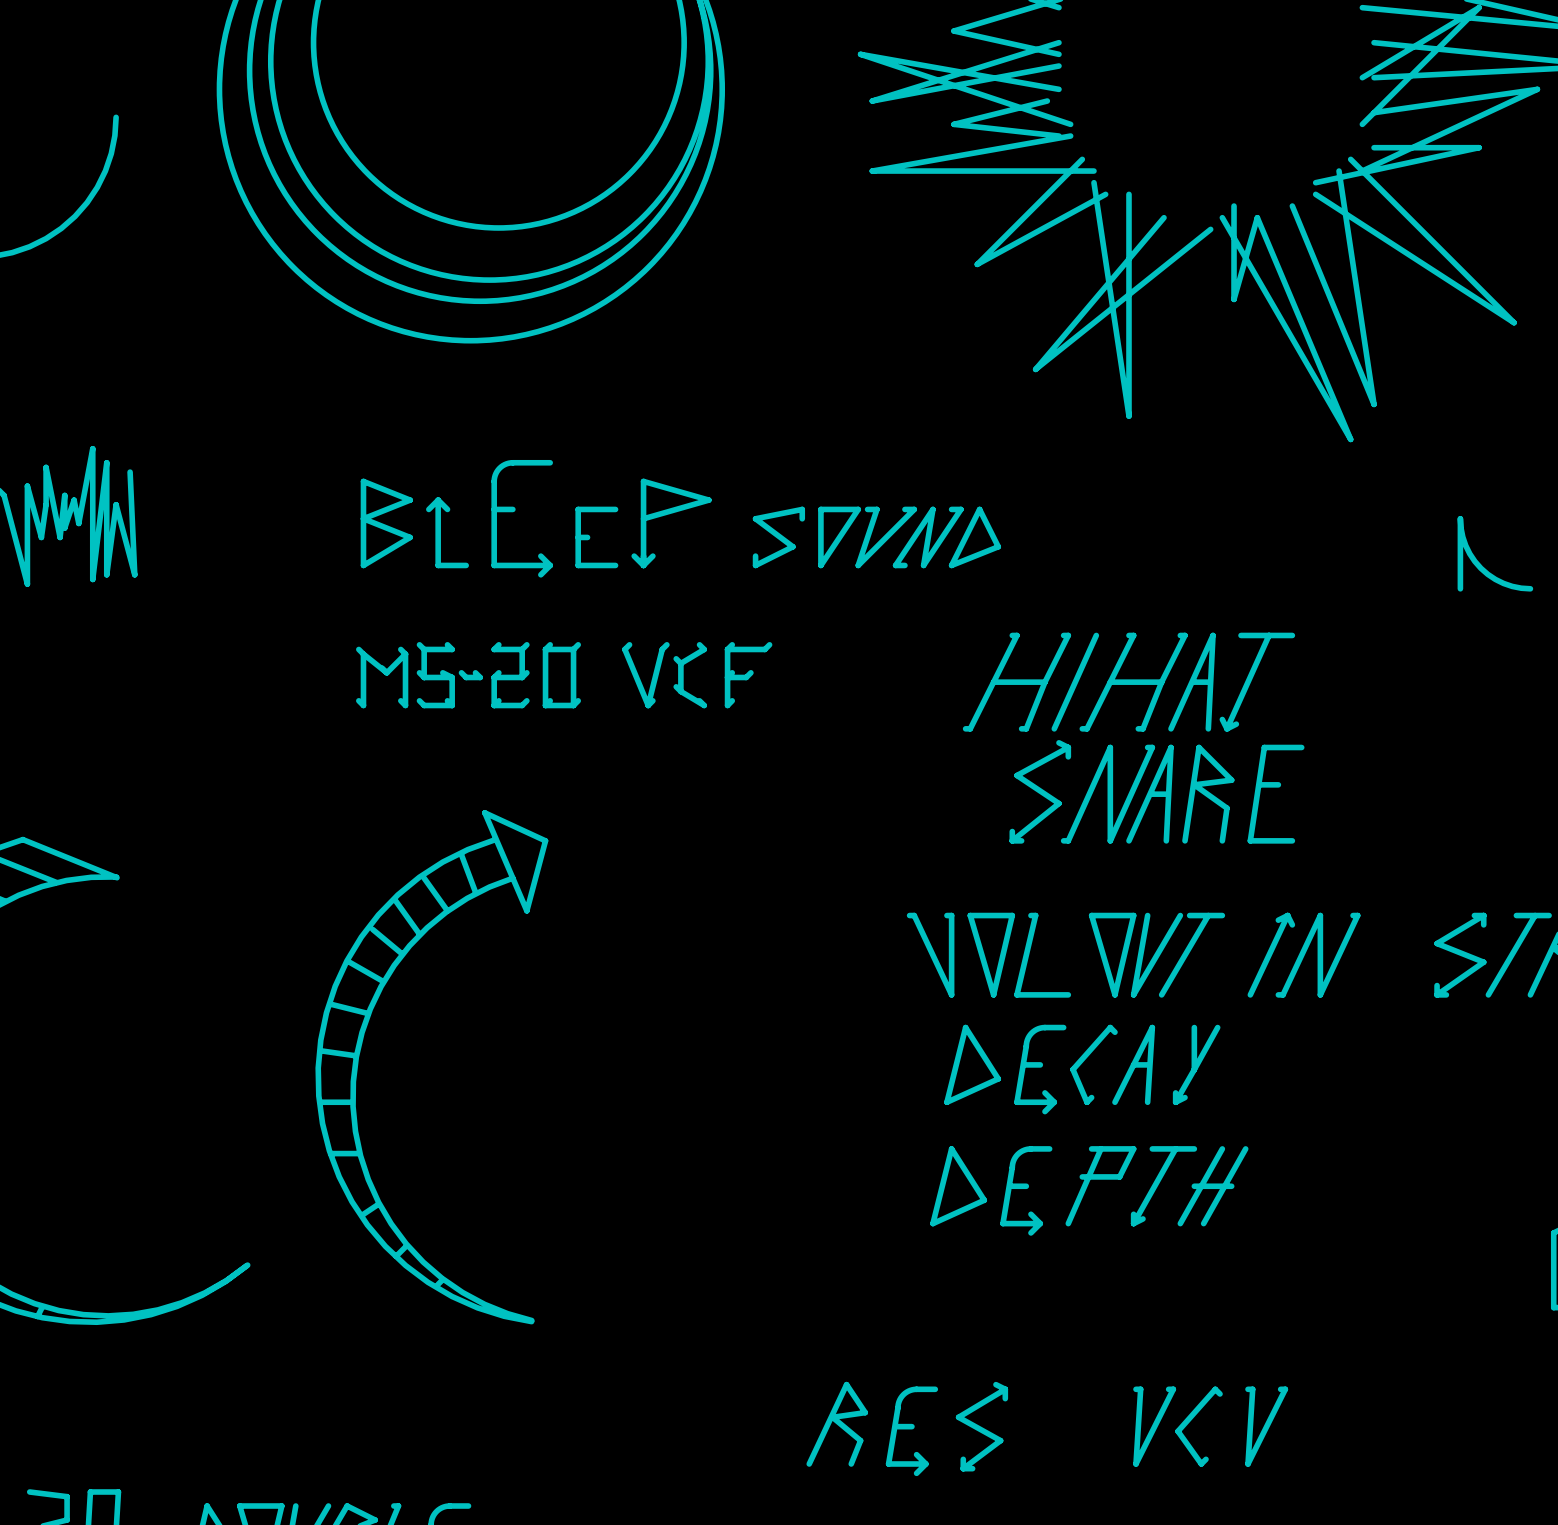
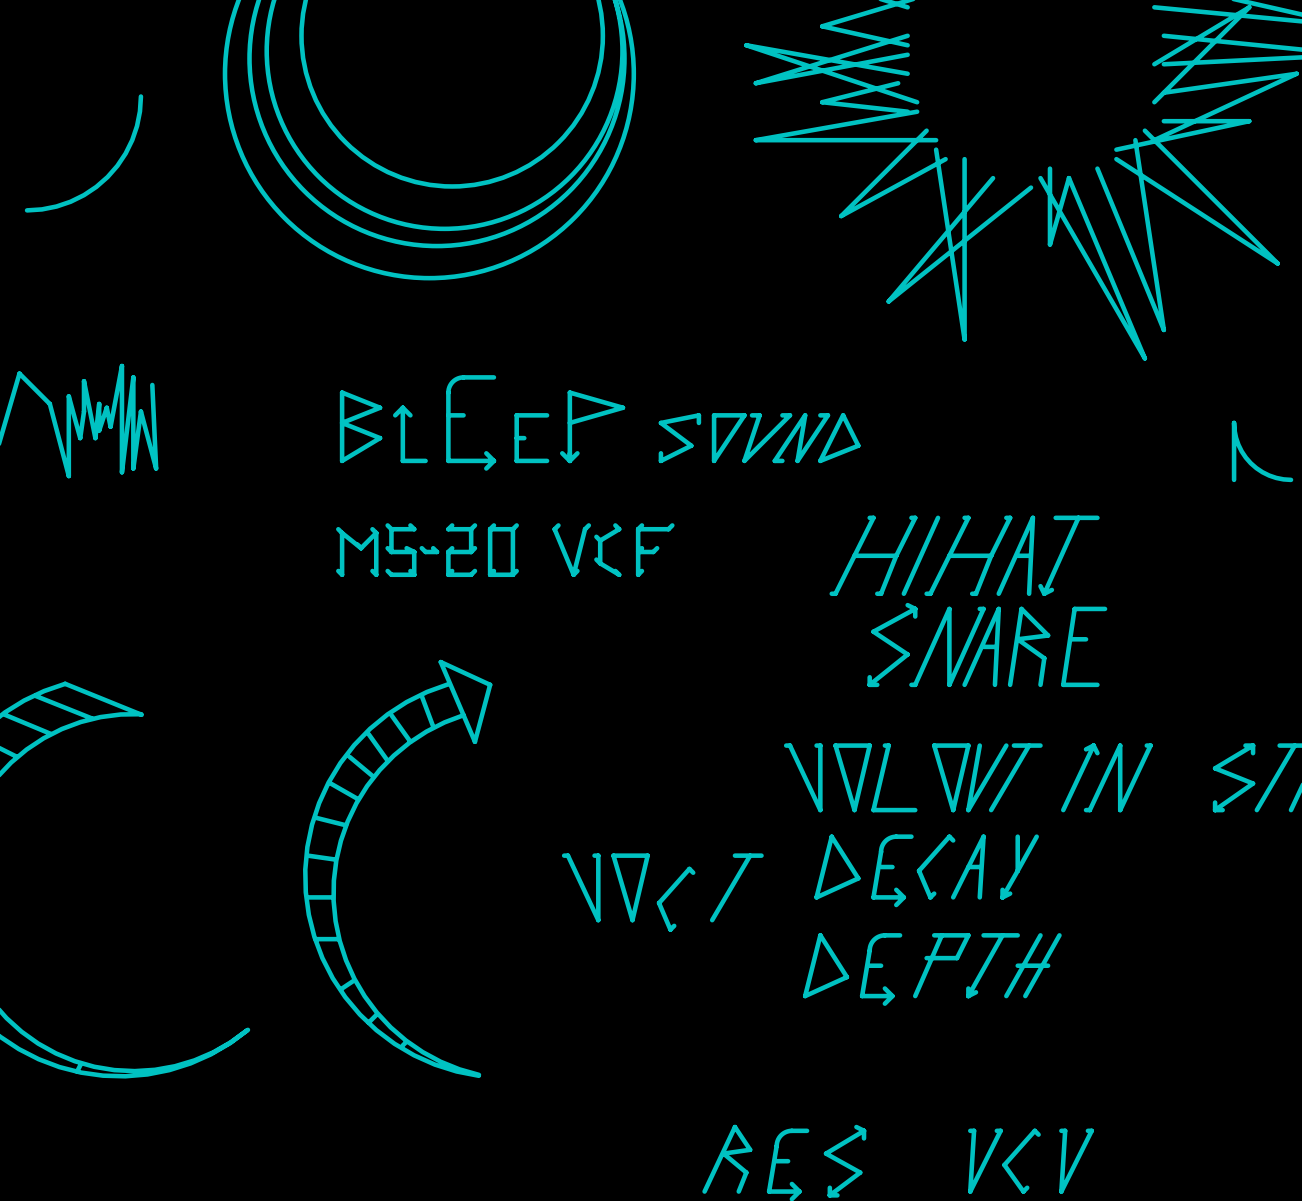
line: none -> (564, 855) (567, 855) (598, 920) (598, 855) (594, 855)
line: none -> (613, 855) (632, 920) (647, 855) (613, 855)
line: none -> (734, 855) (761, 855)
line: none -> (750, 855) (712, 920)
line: none -> (693, 872) (689, 868) (659, 903) (670, 929) (674, 925)

